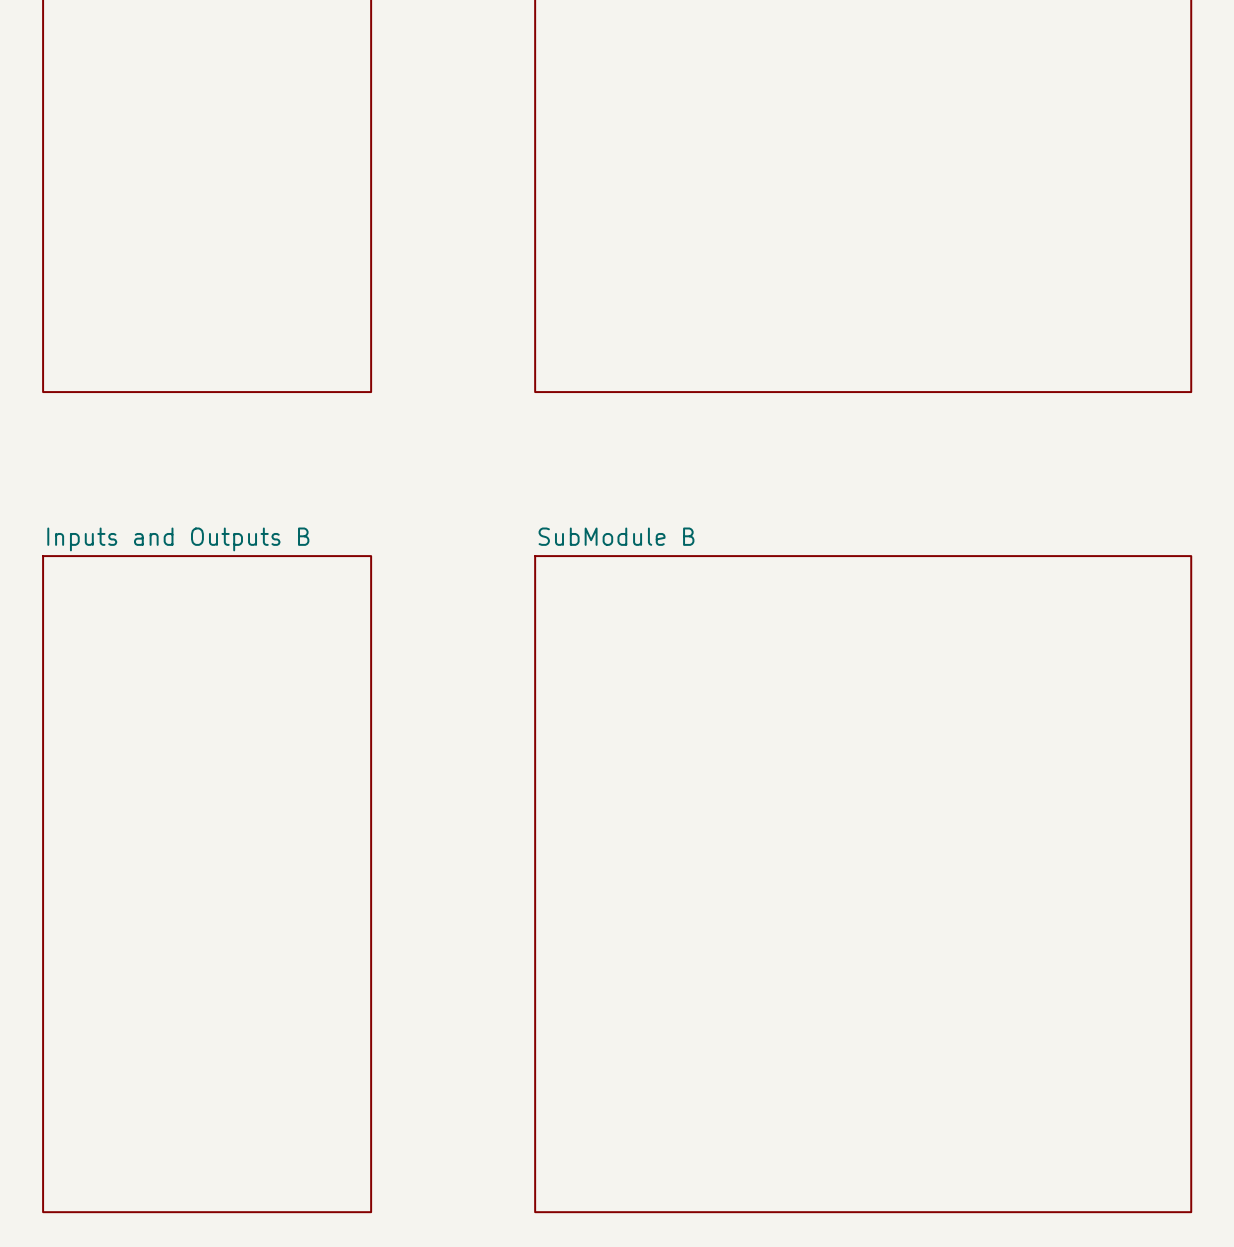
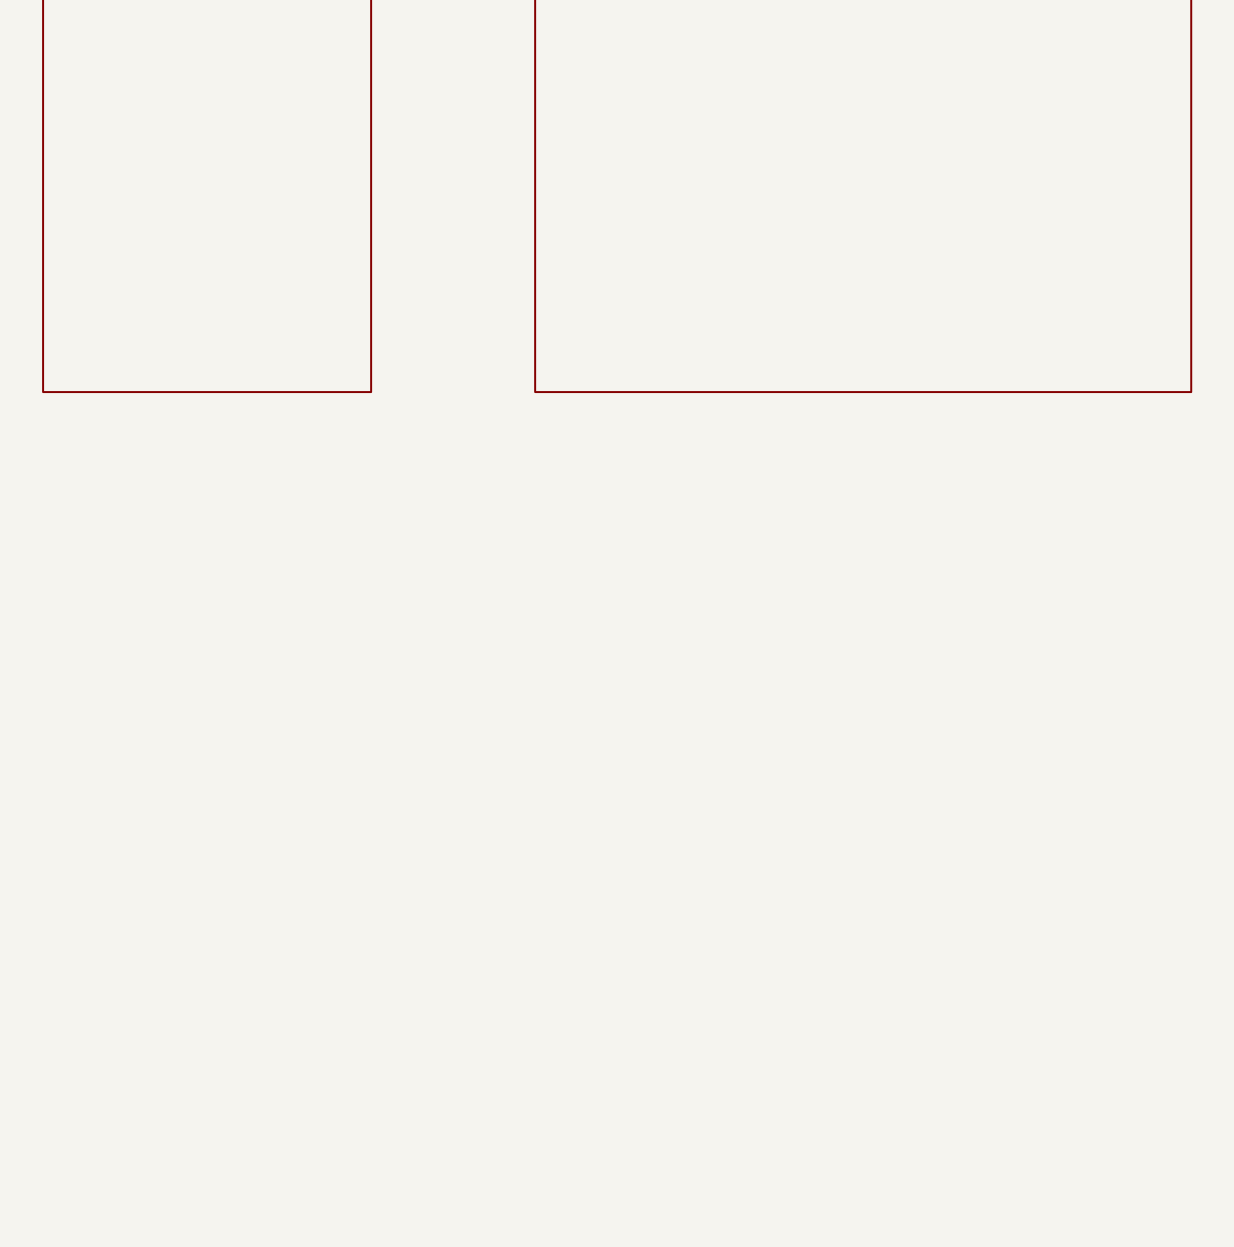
sheet Inputs and Outputs B: (207, 884) -> none
sheet SubModule B: (863, 884) -> none

